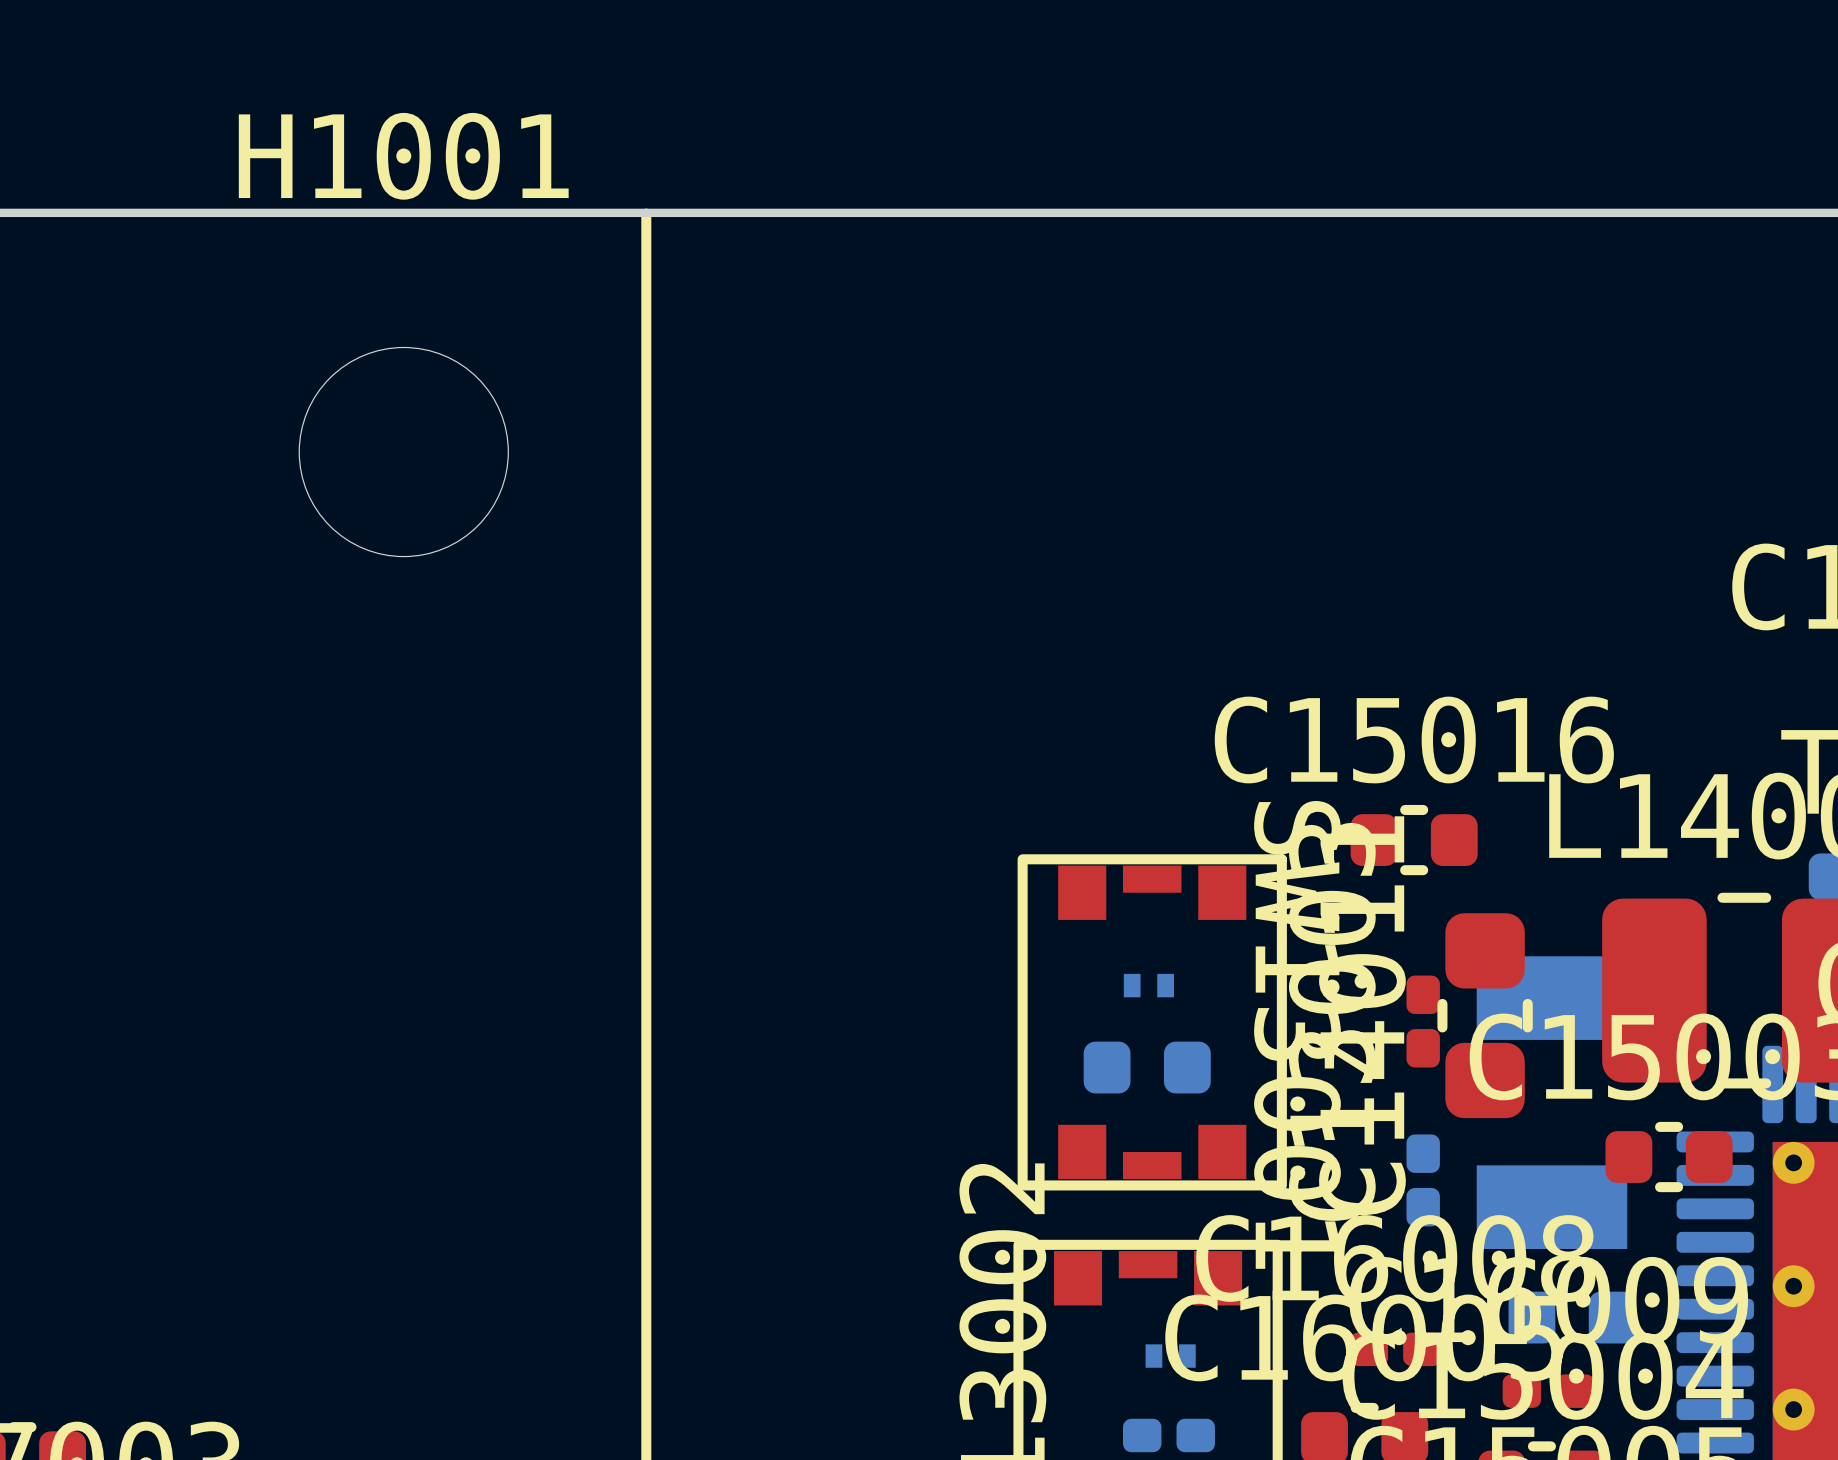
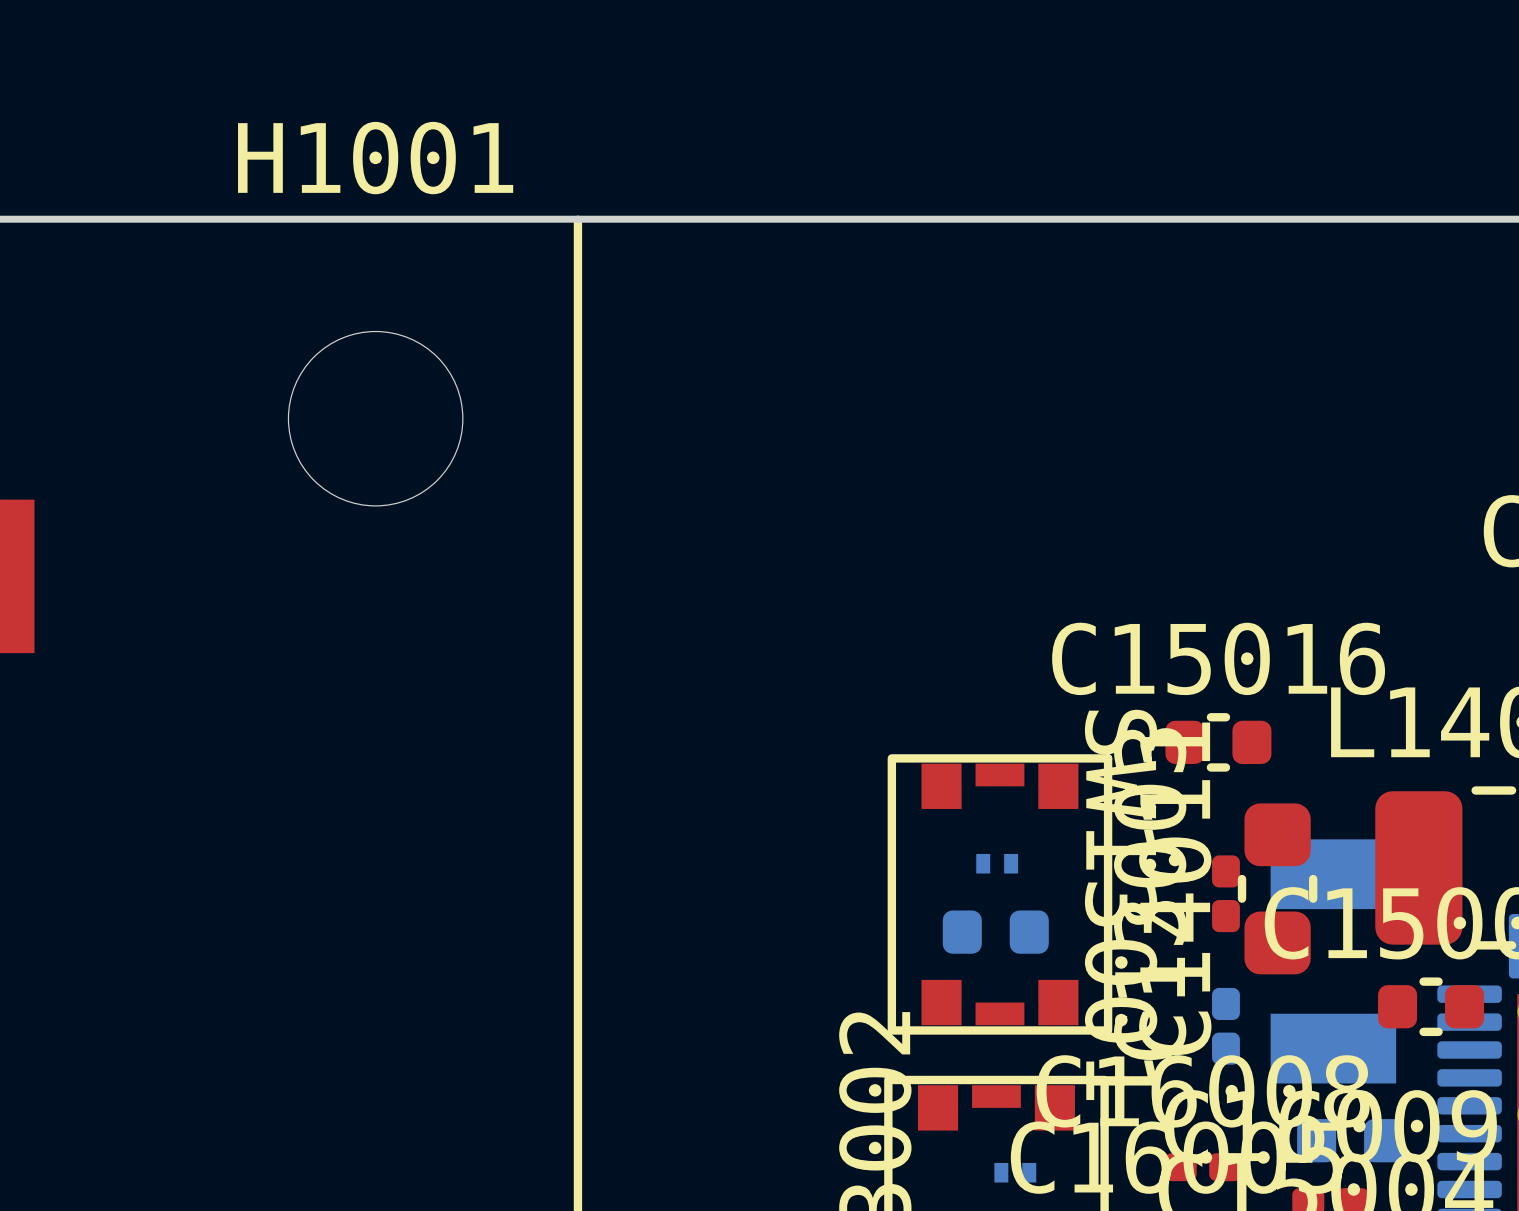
H1001 name position: H1001 (403, 156) -> H1001 (375, 158)

